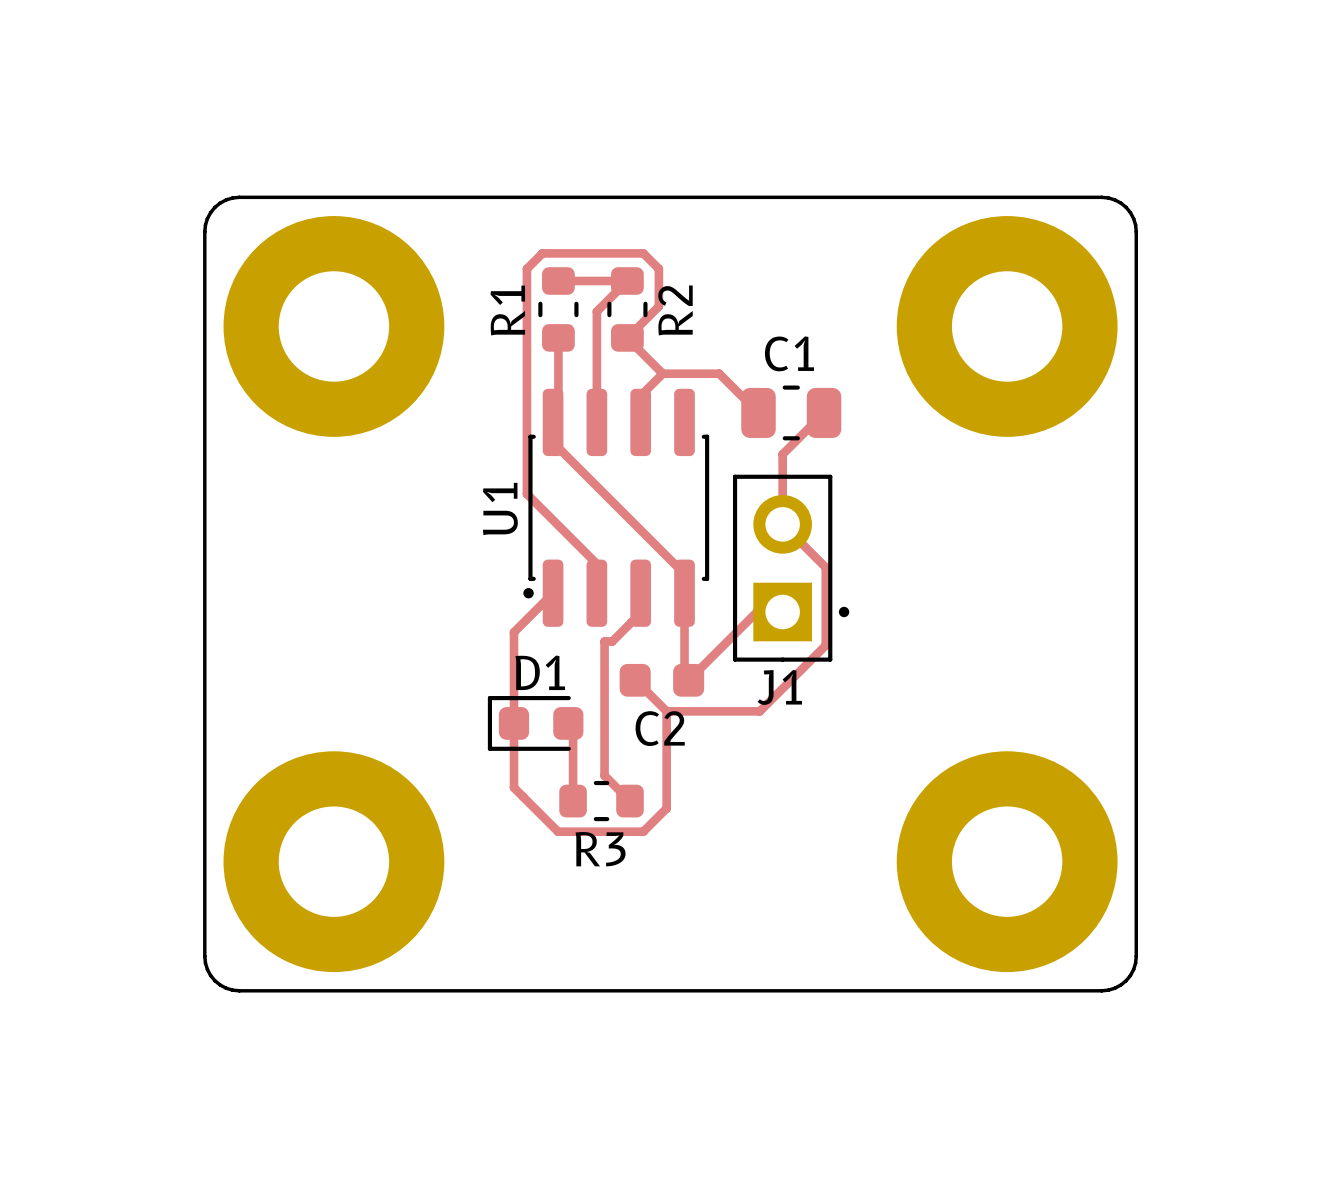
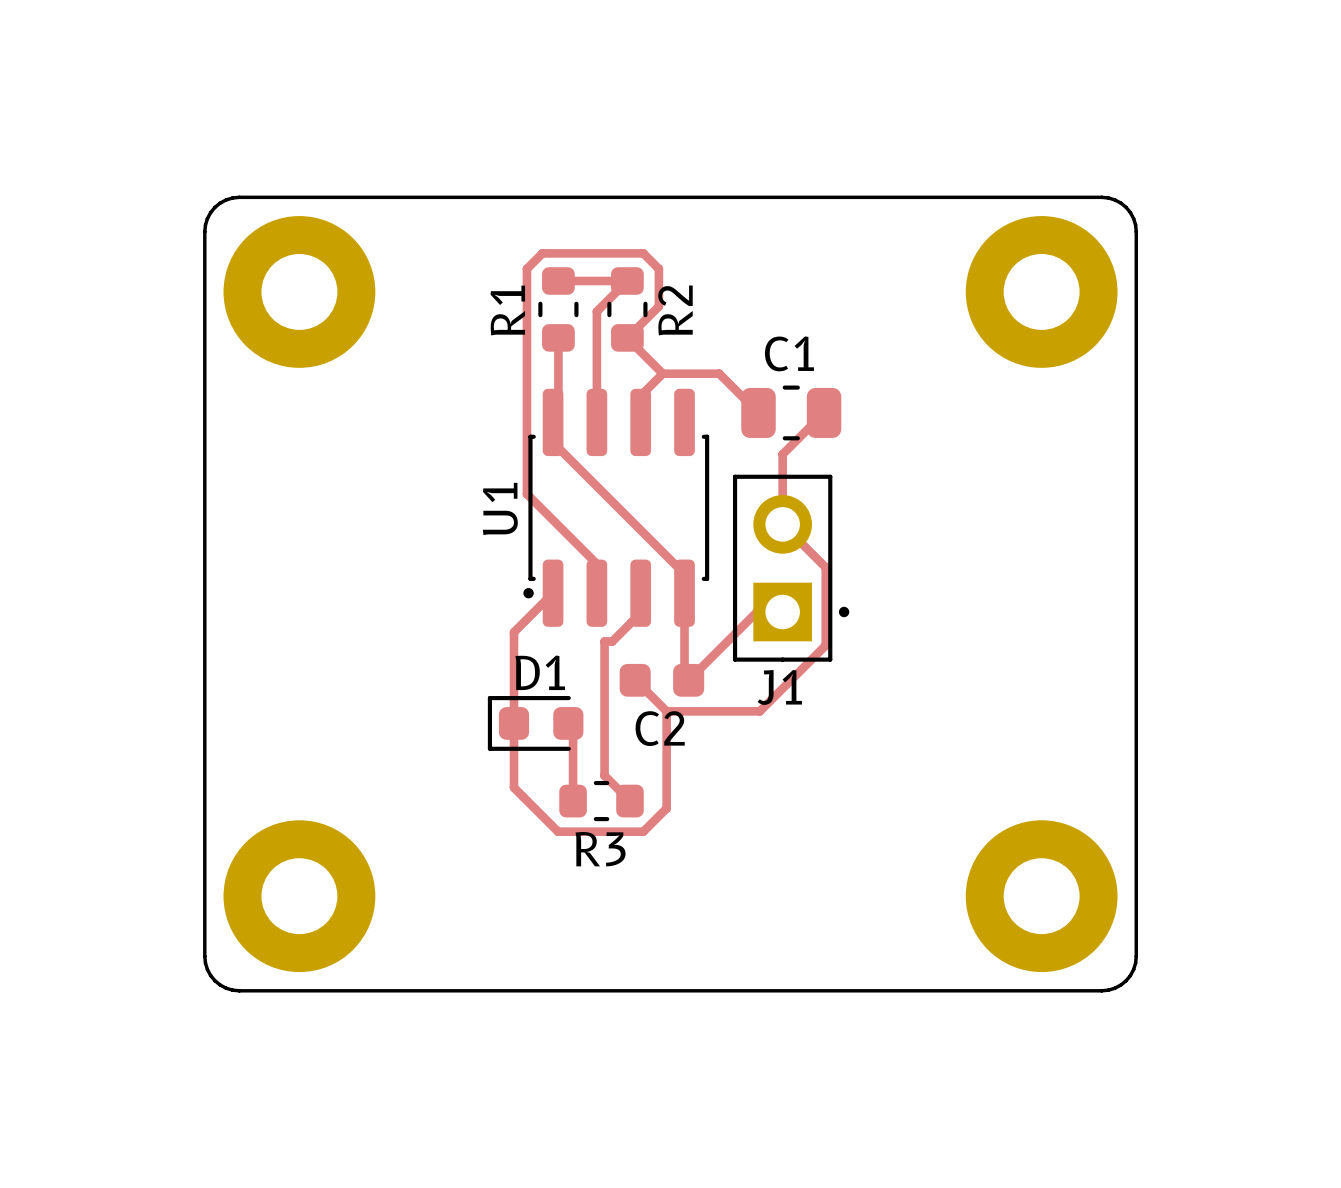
part: none -> (299, 291)
part: none -> (1041, 291)
part: (333, 326) -> none
part: (1007, 326) -> none
part: (333, 861) -> none
part: (1007, 861) -> none
part: none -> (299, 896)
part: none -> (1041, 896)

